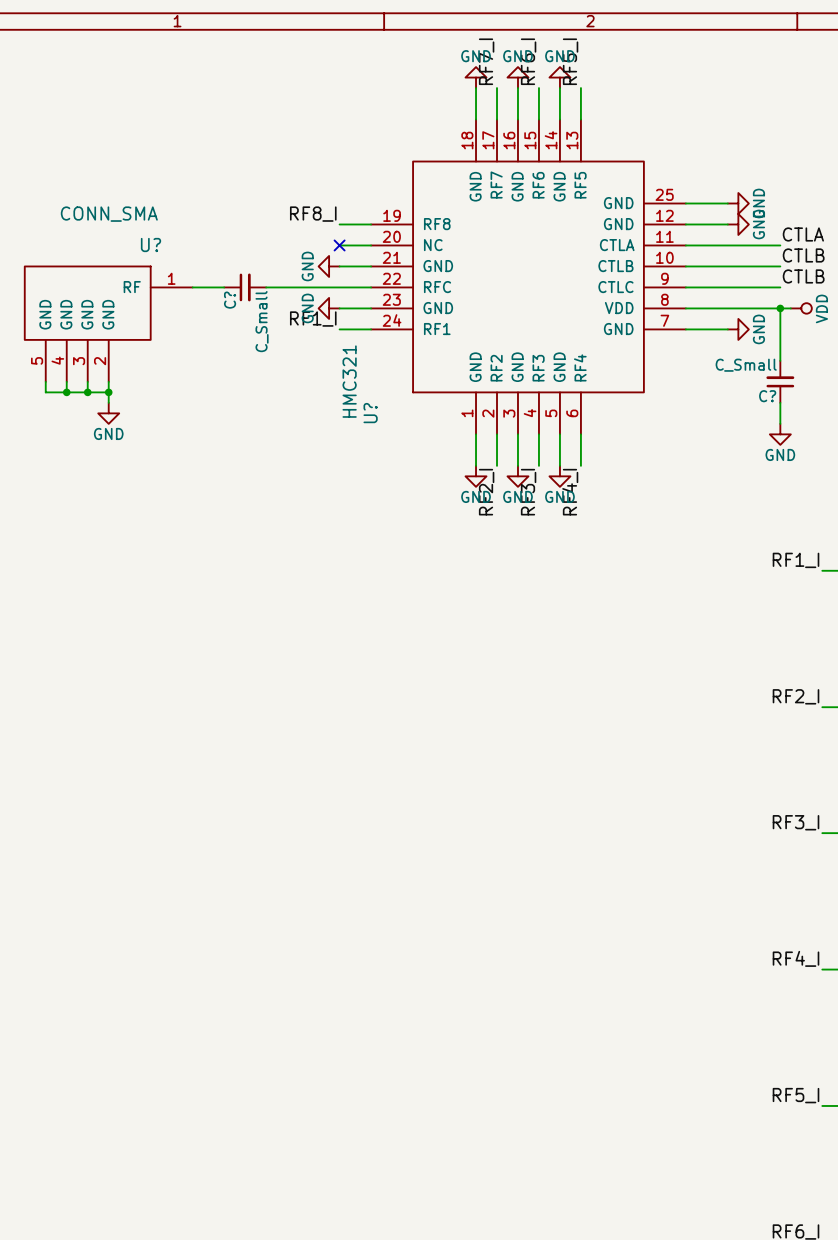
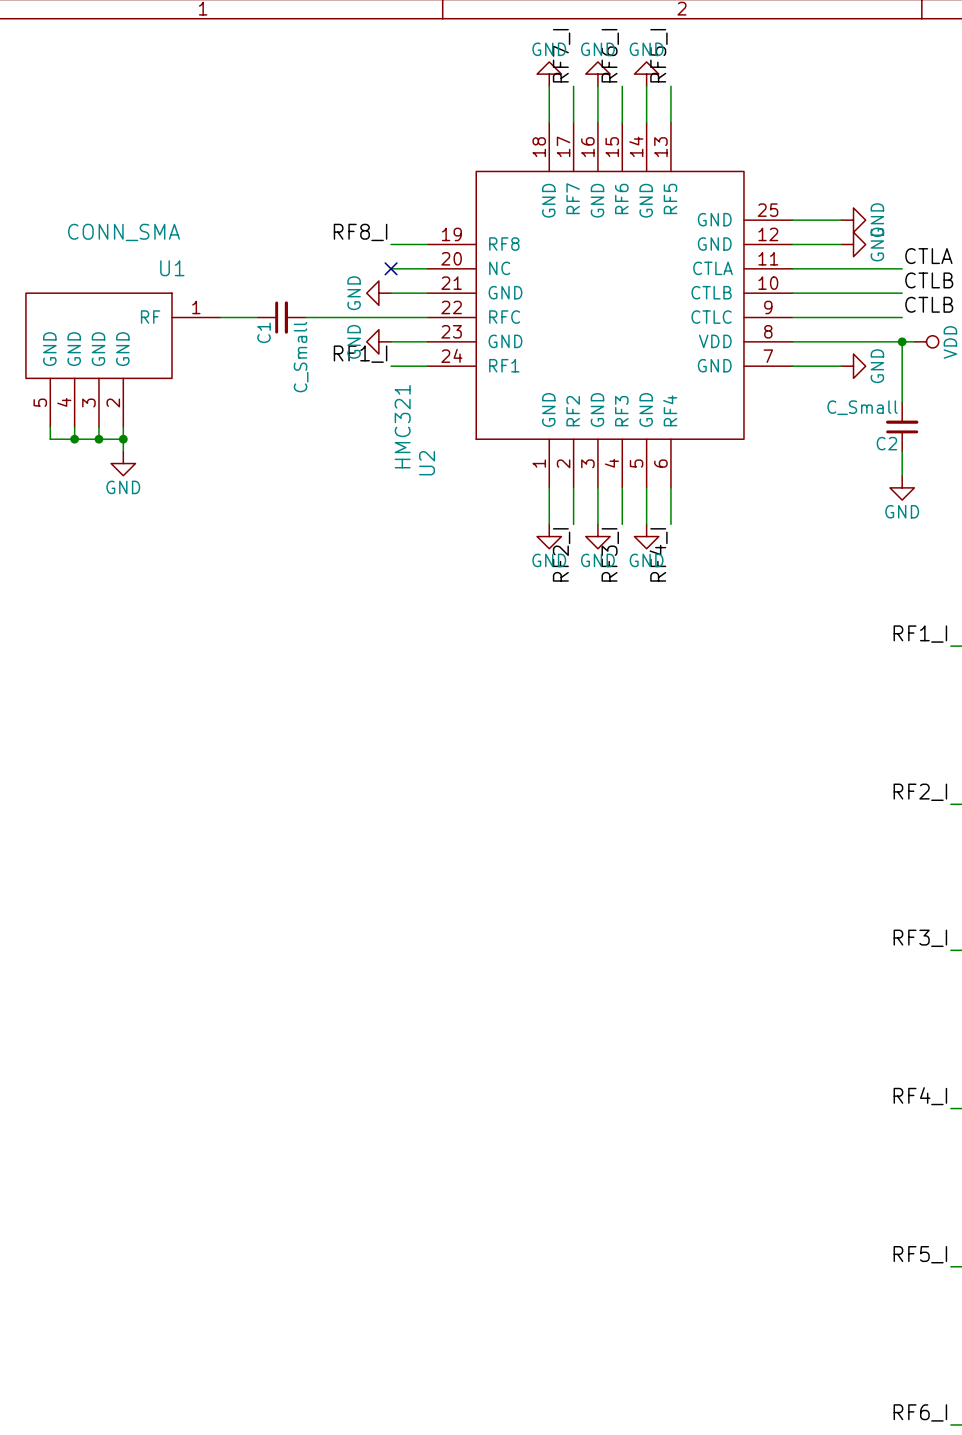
U? name: U? (150, 245) -> U1 (172, 268)
C? name: C? (230, 300) -> C1 (264, 332)
C? name: C? (767, 396) -> C2 (886, 443)
U? name: U? (370, 413) -> U2 (427, 463)

